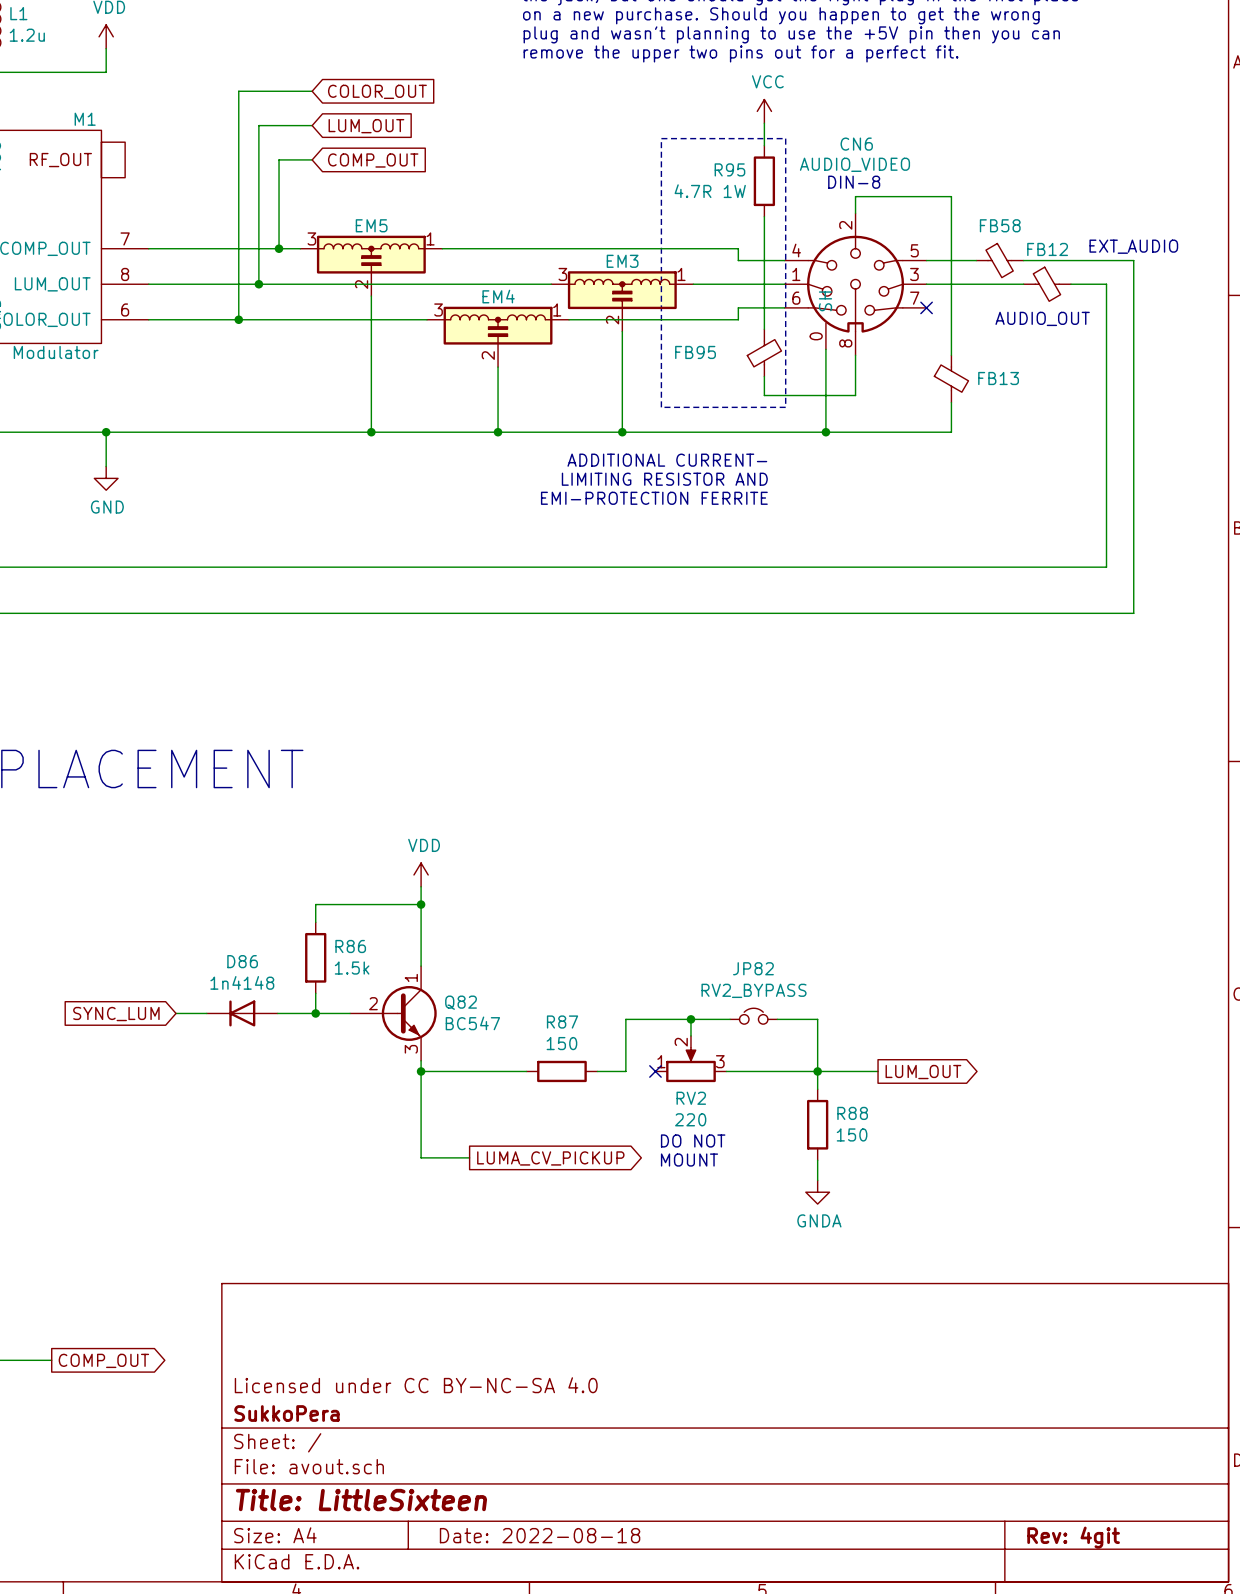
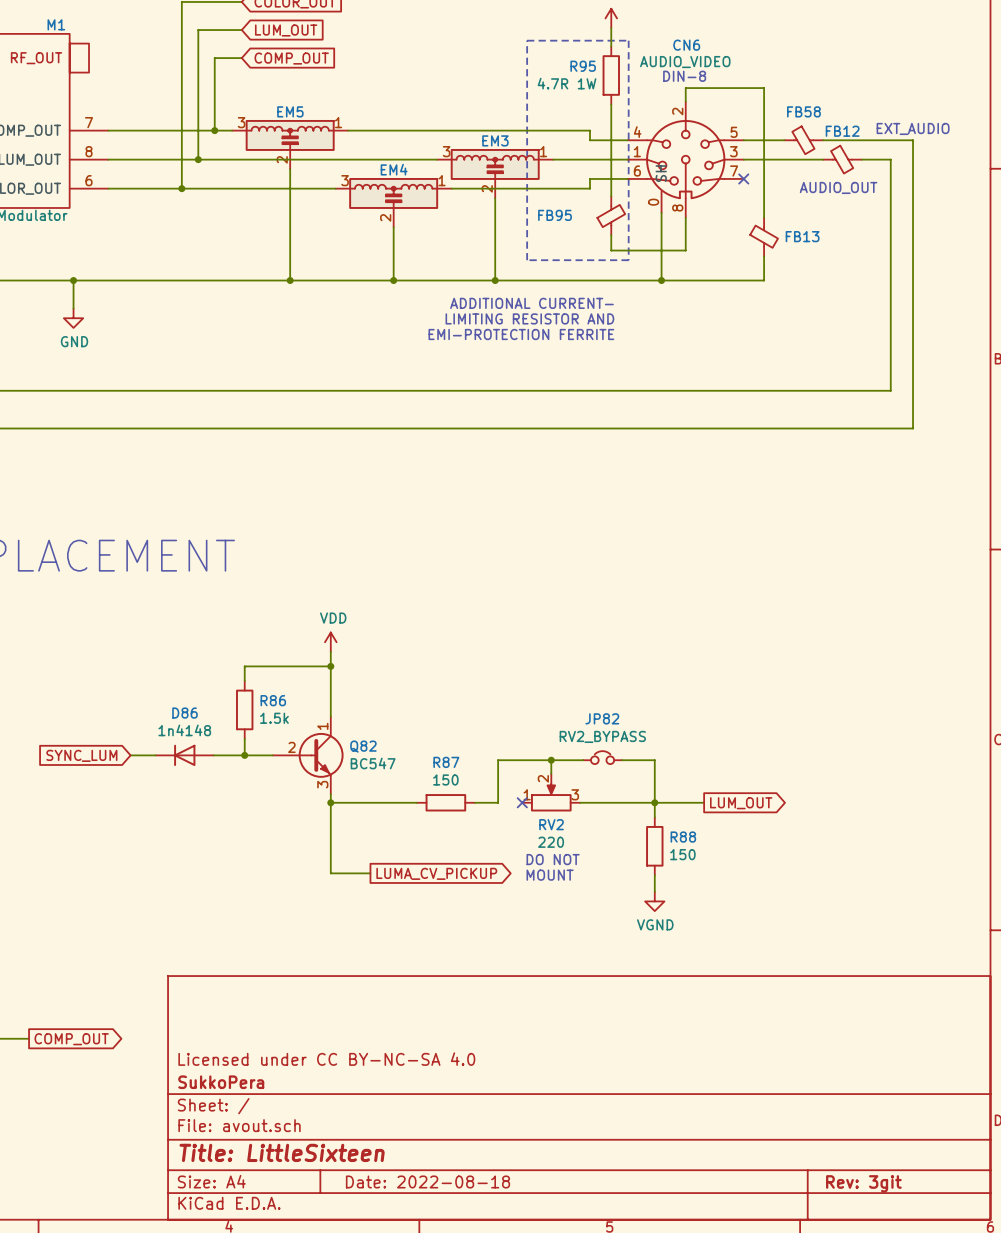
power symbol: GNDA (817, 1192) -> VGND (654, 901)
title block: Rev: 4git (1073, 1537) -> Rev: 3git (863, 1183)

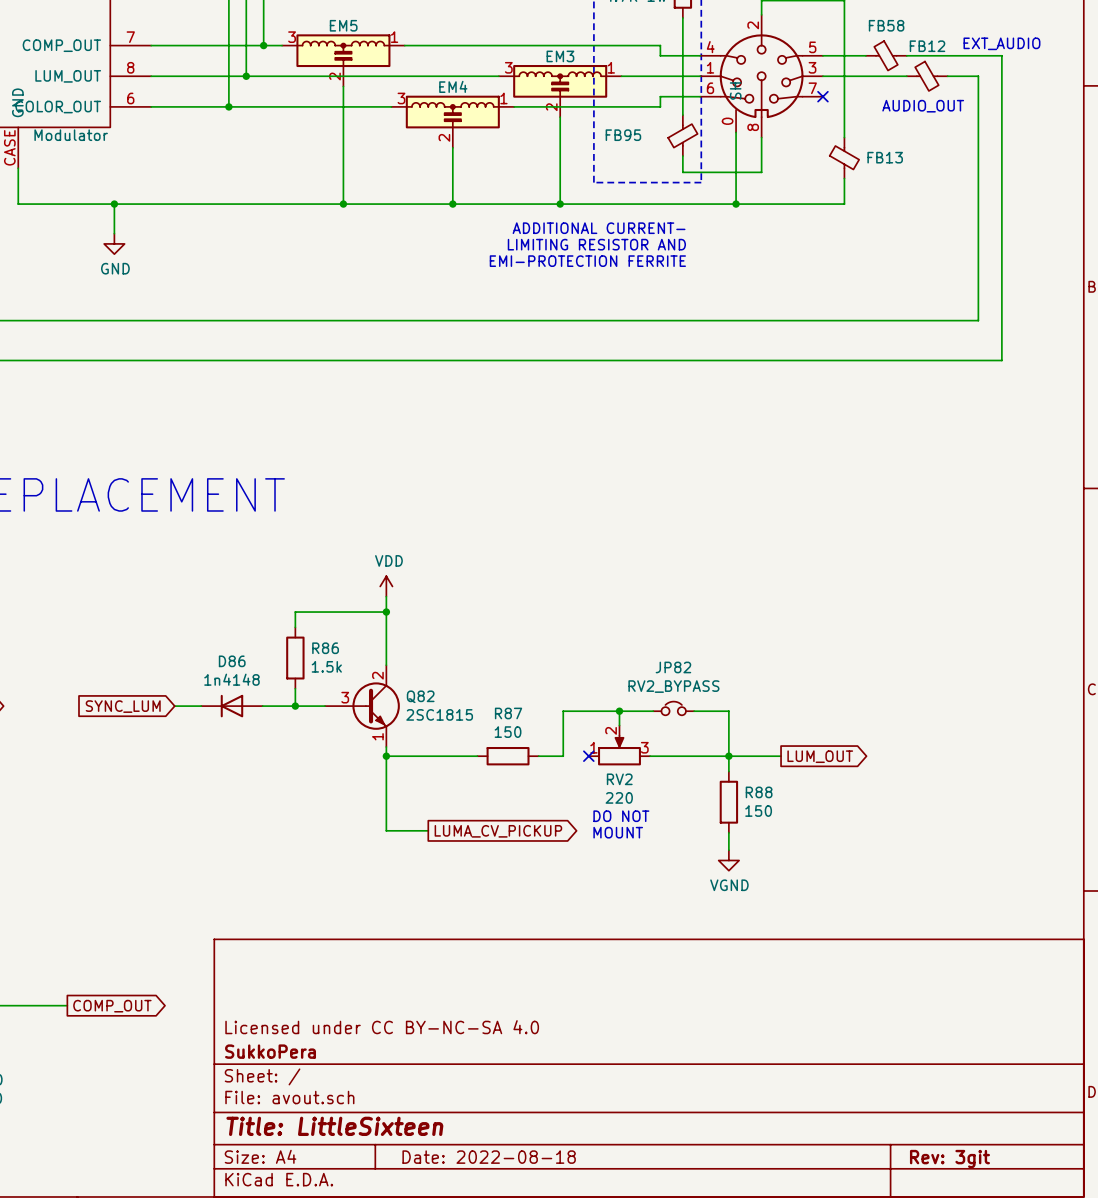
Q82 symbol: [272, 716, 344, 795] -> [325, 665, 400, 747]
Q82 value: BC547 (373, 763) -> 2SC1815 (439, 714)

